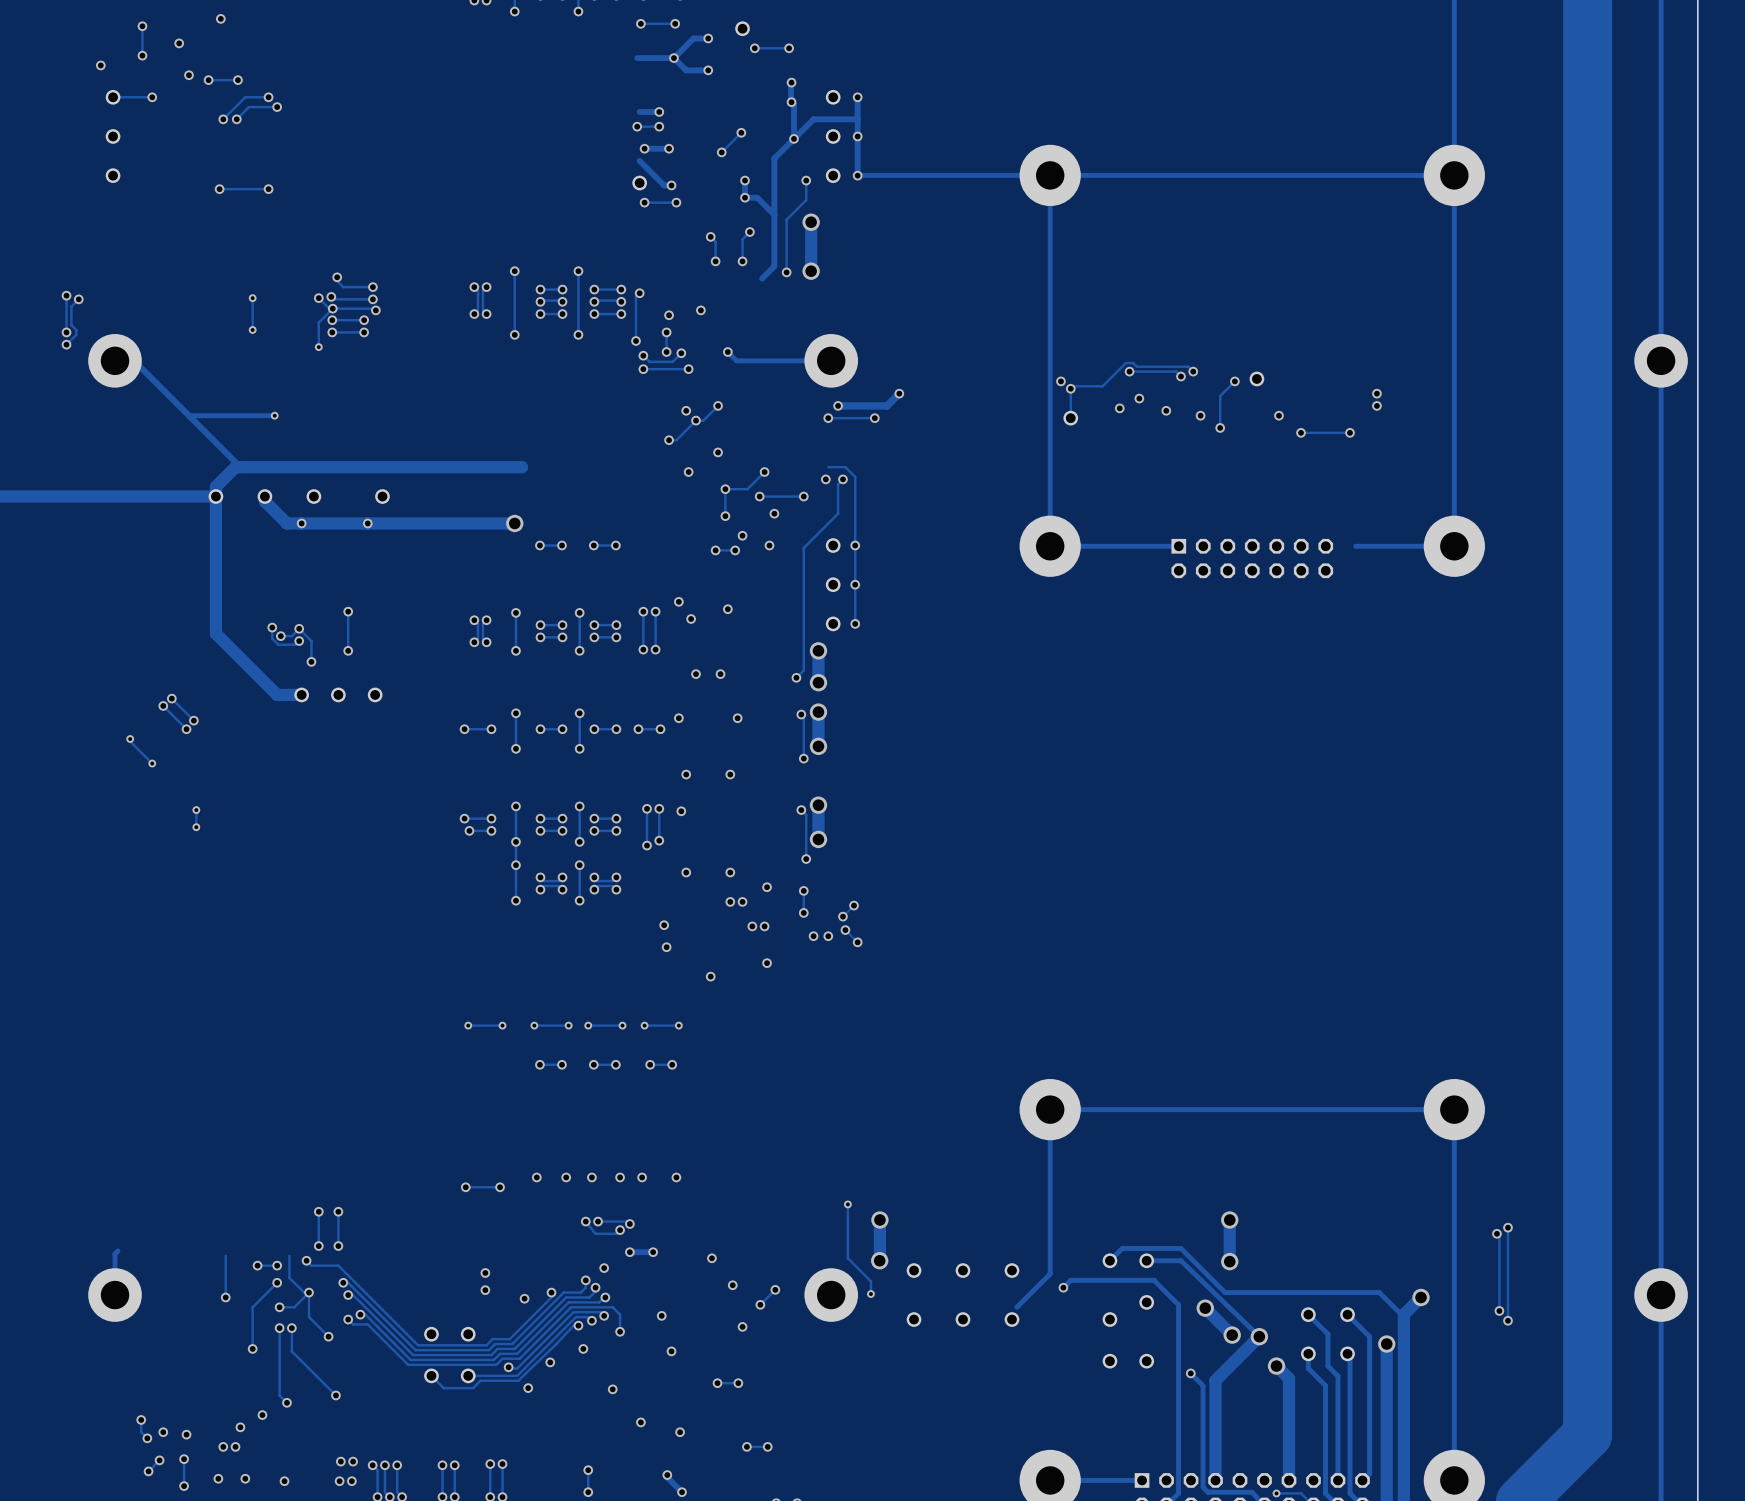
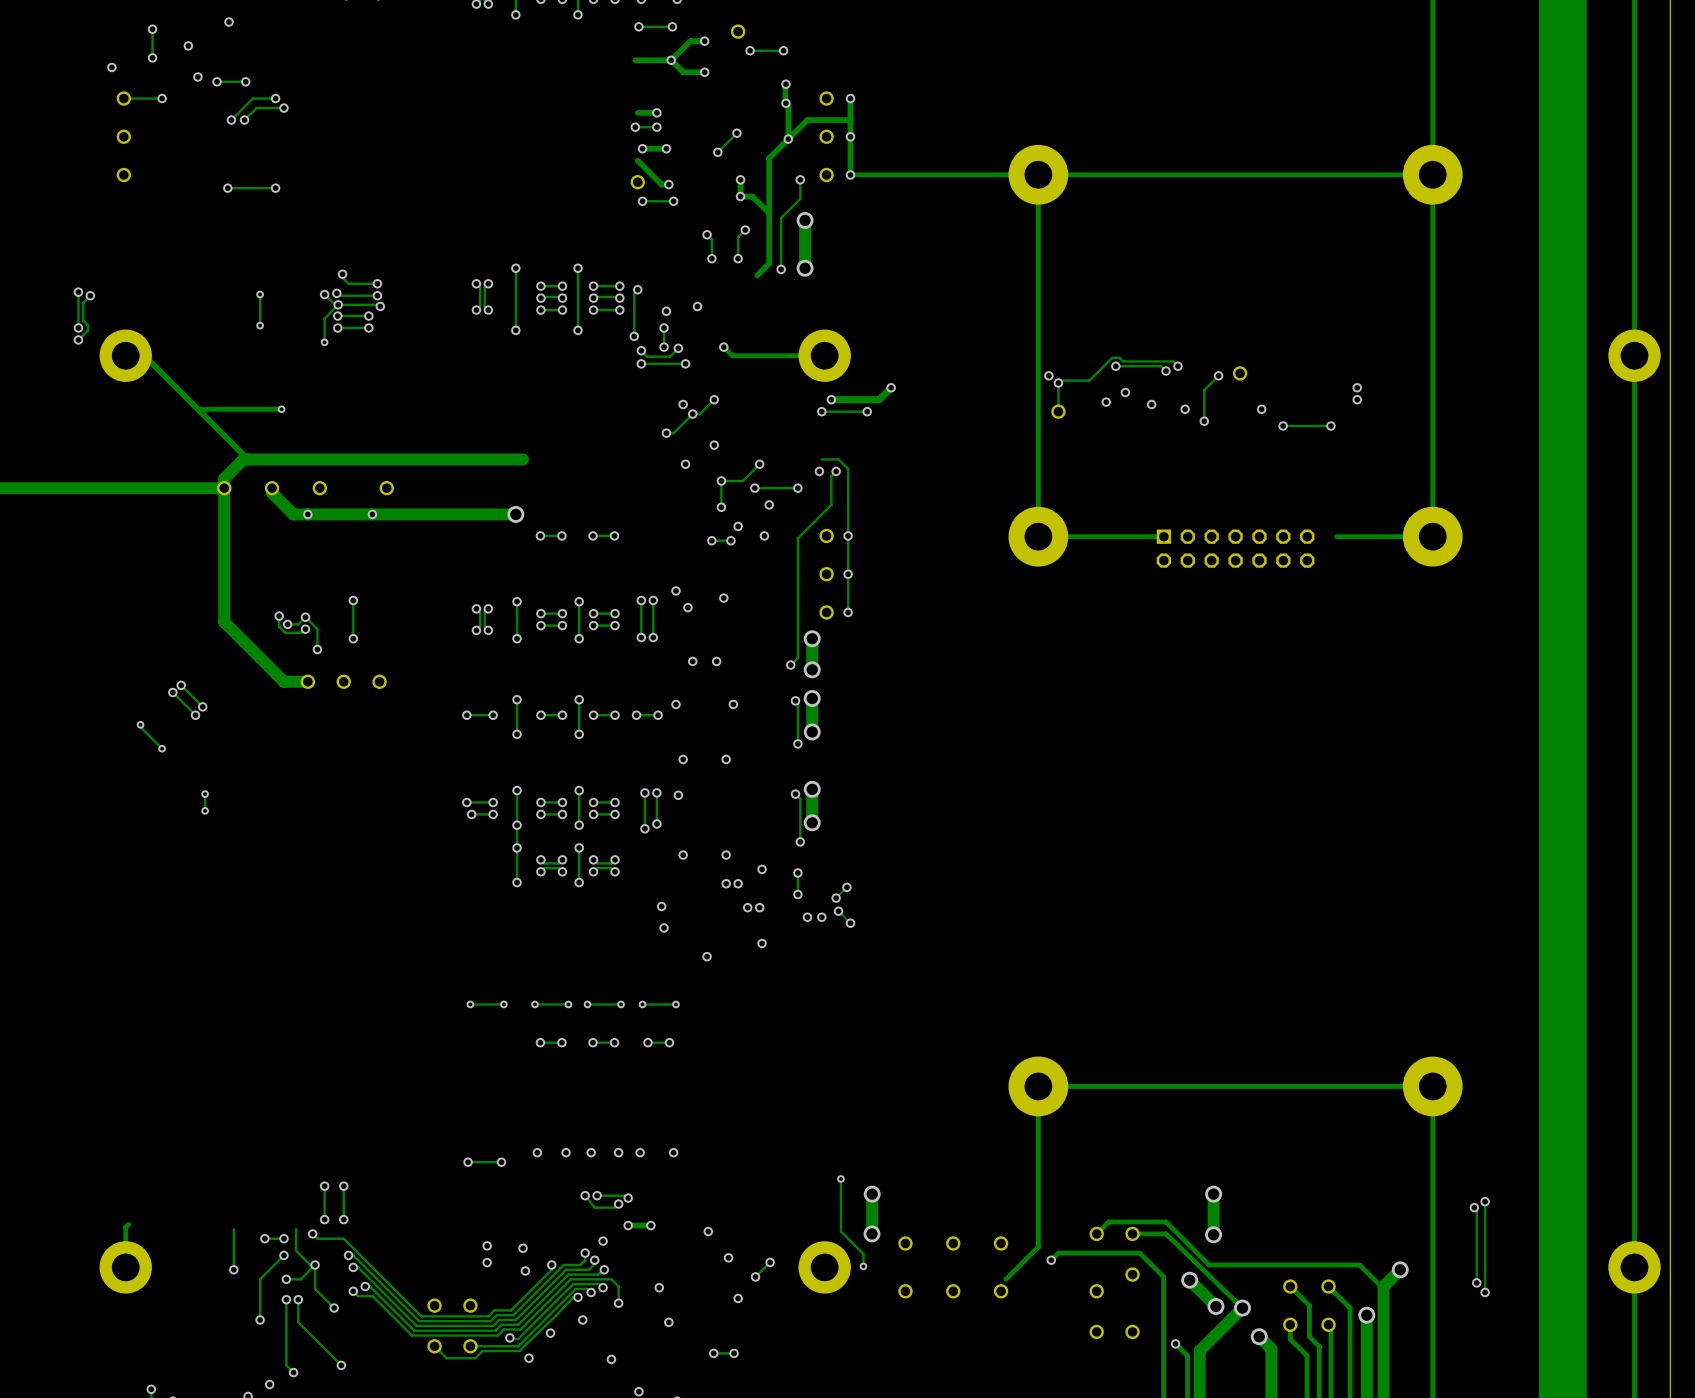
via: none -> (523, 1248)

